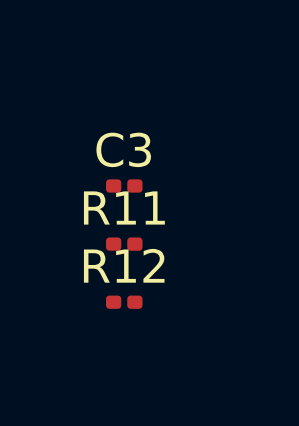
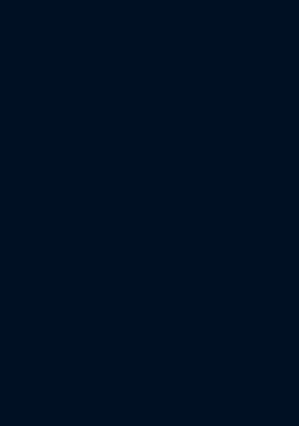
C3: (124, 185) -> none
R11: (124, 244) -> none
R12: (124, 302) -> none

